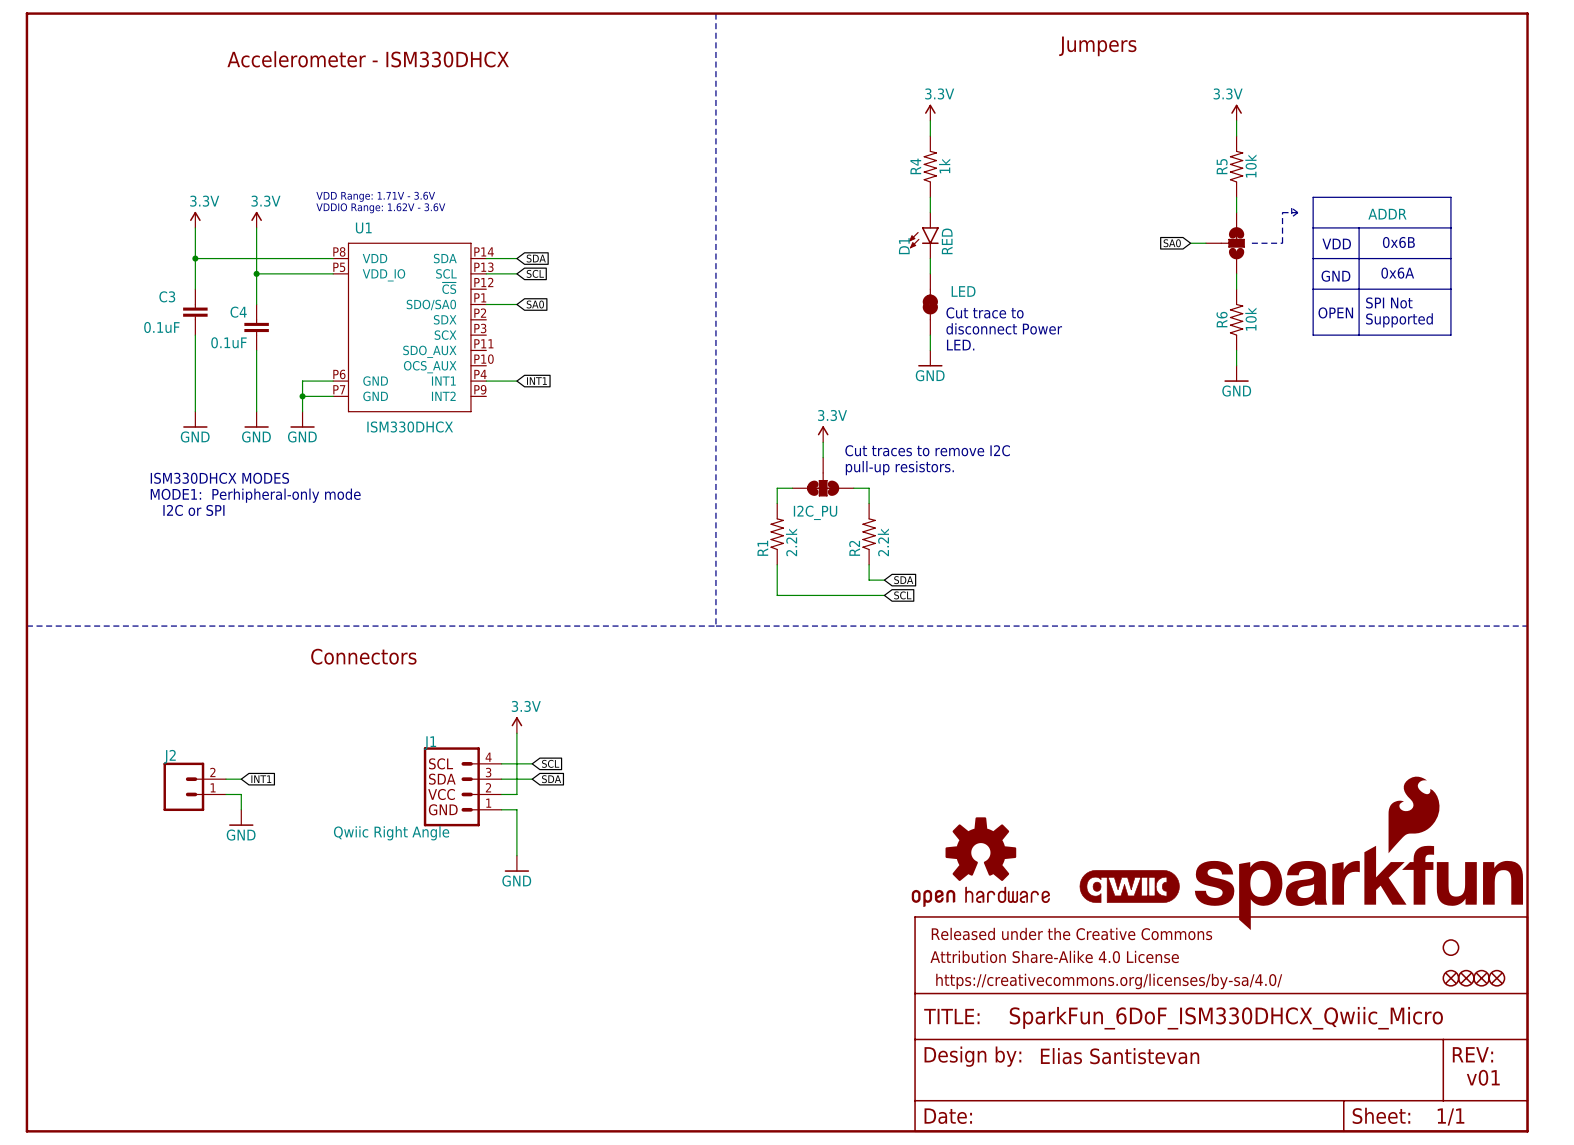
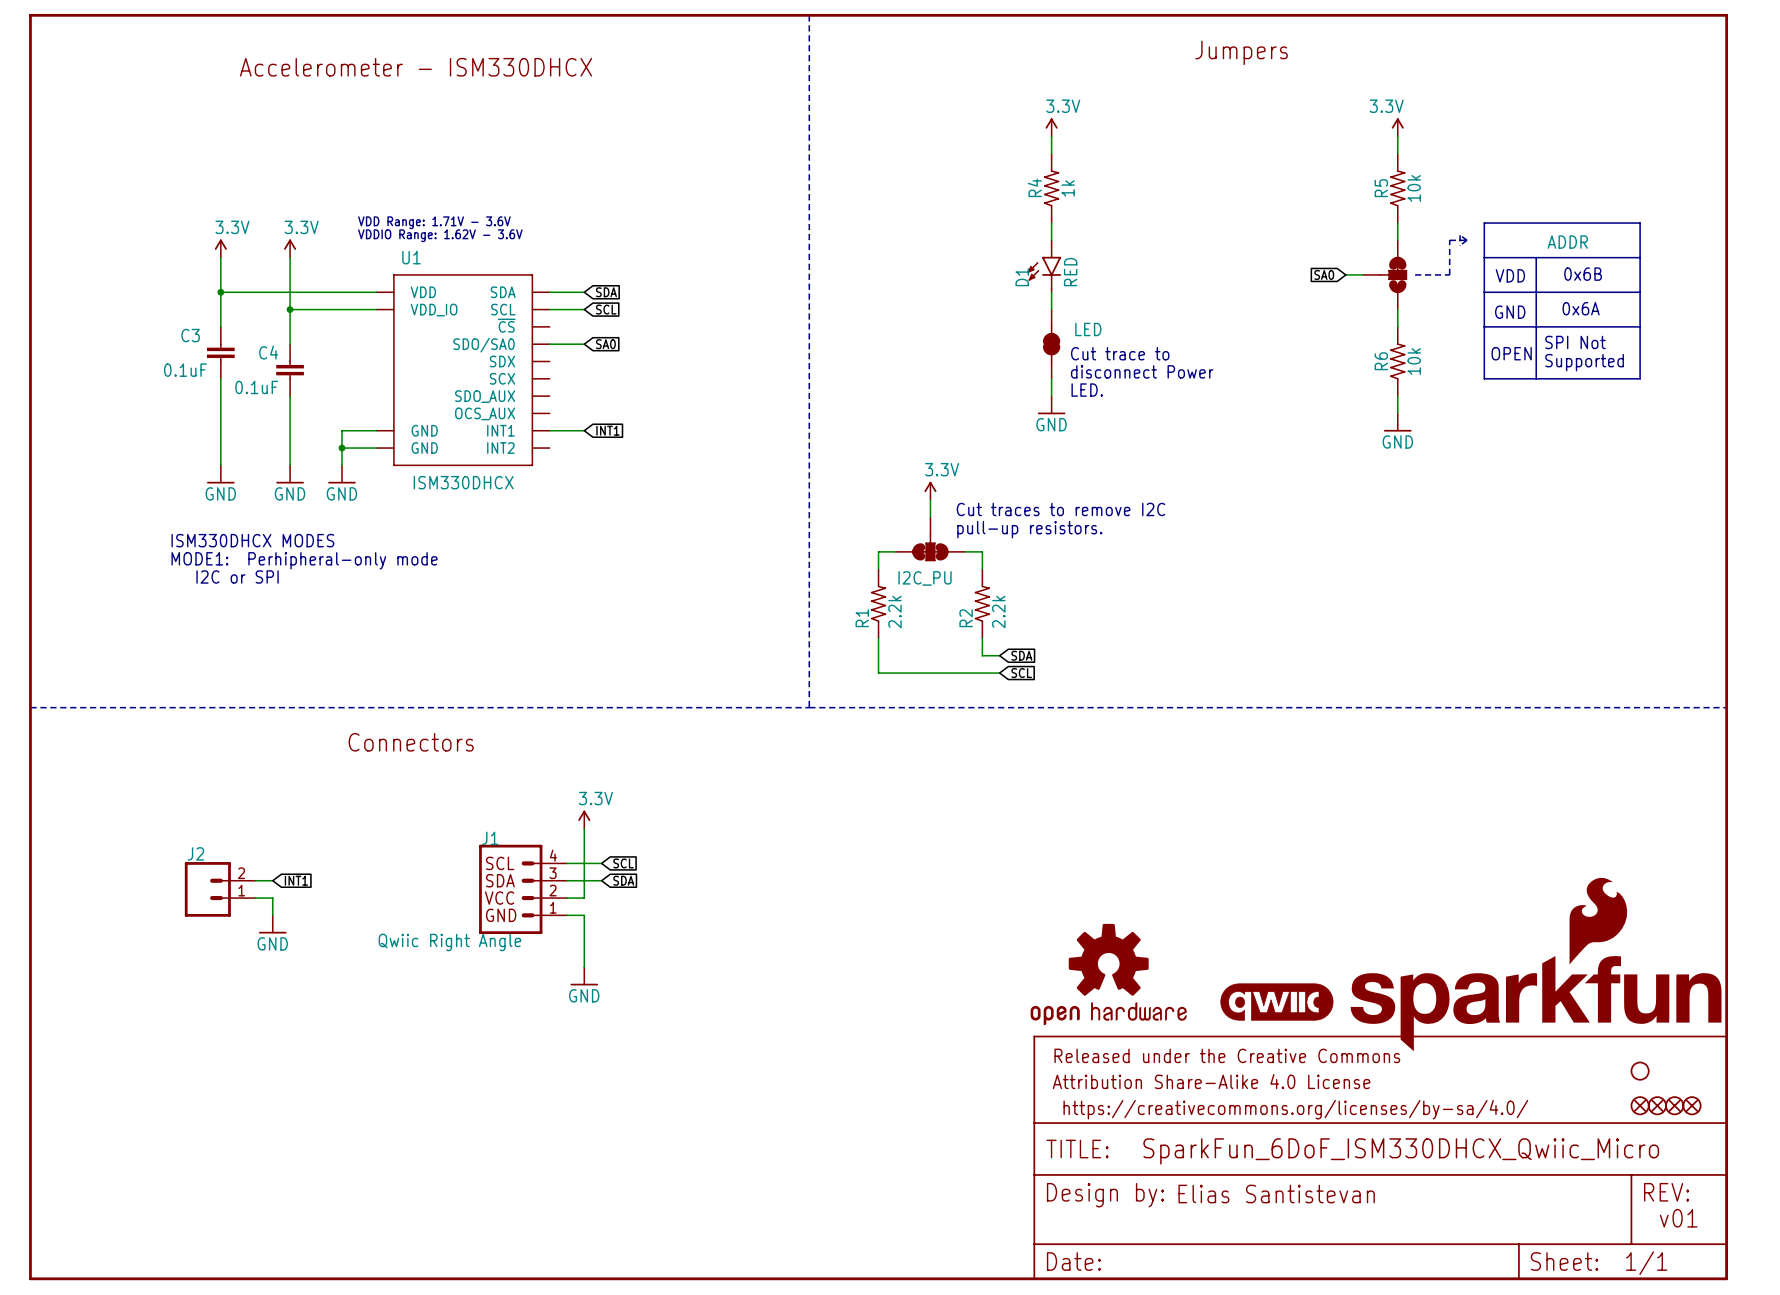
U1 symbol: [333, 242, 487, 413] -> [376, 274, 550, 466]

